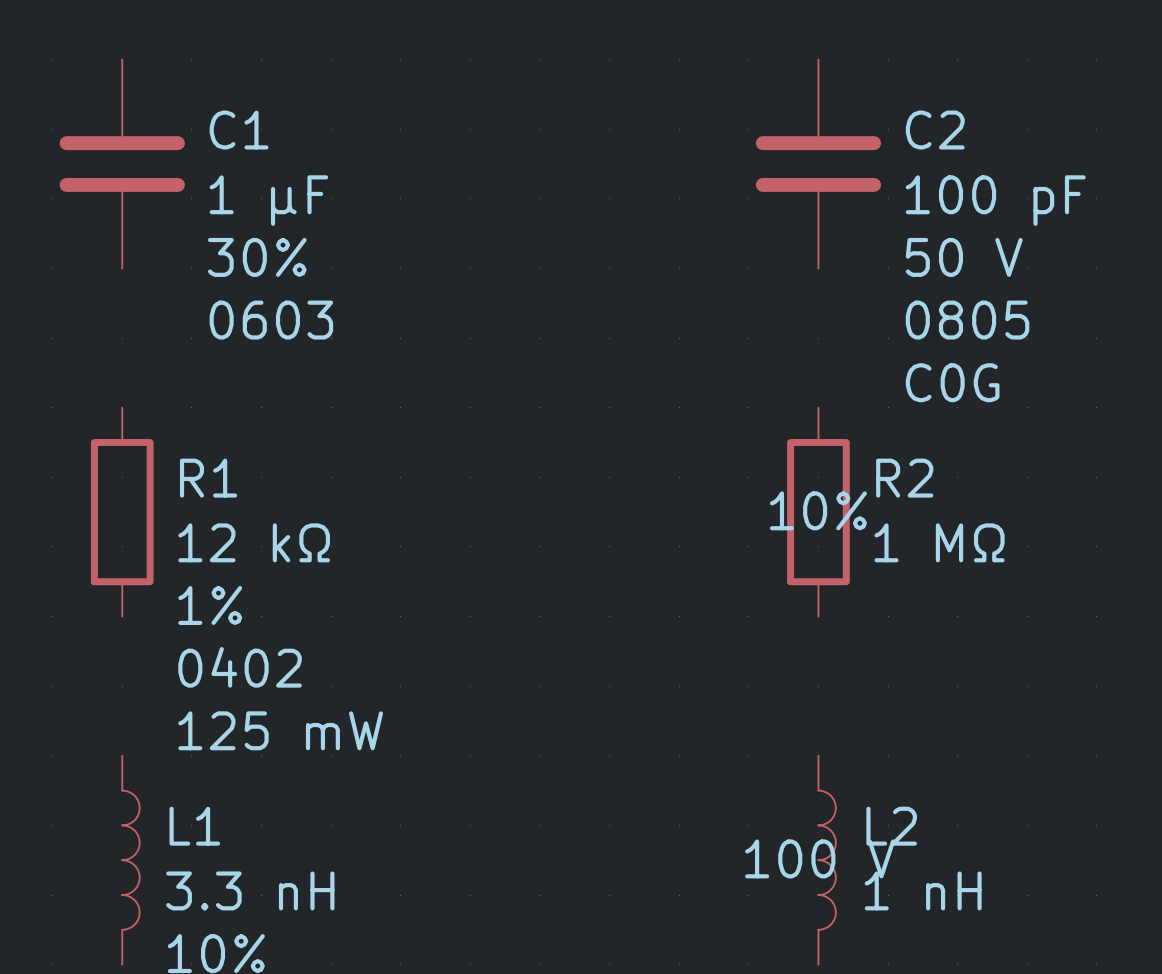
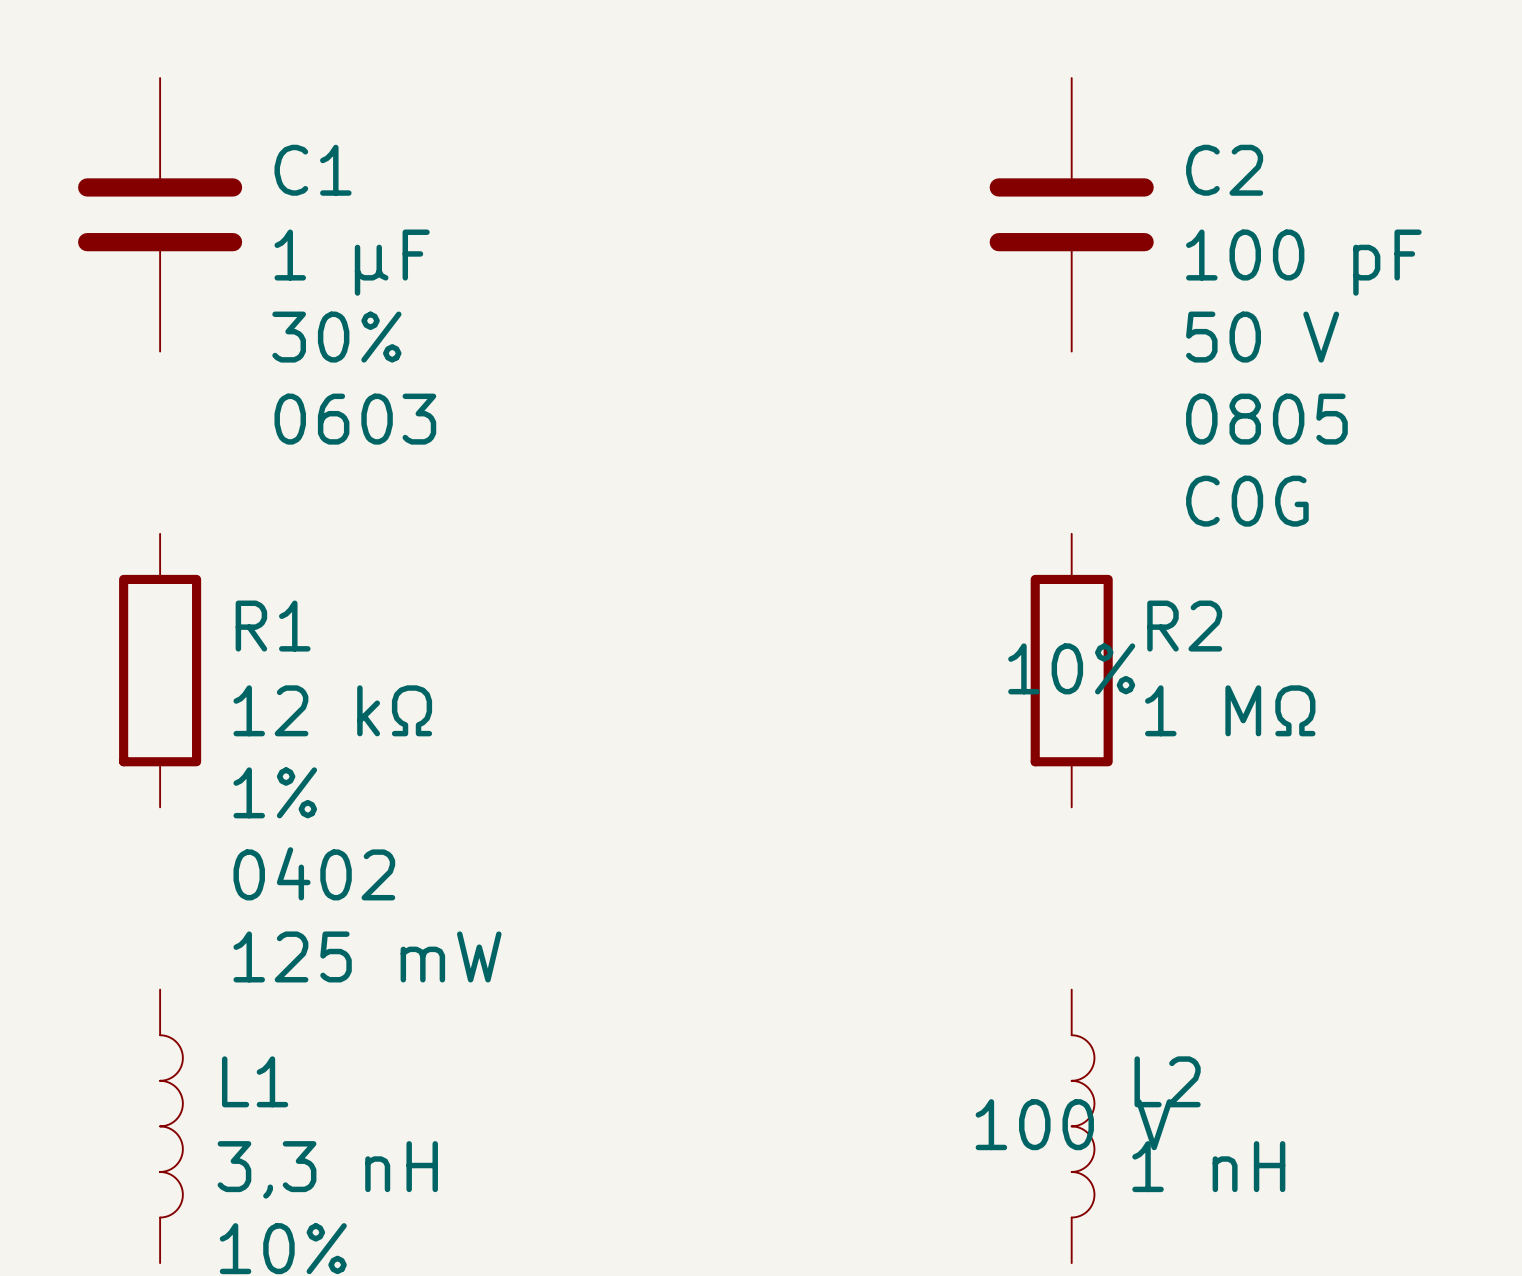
L1 value: 3.3 nH (250, 890) -> 3,3 nH (327, 1169)

